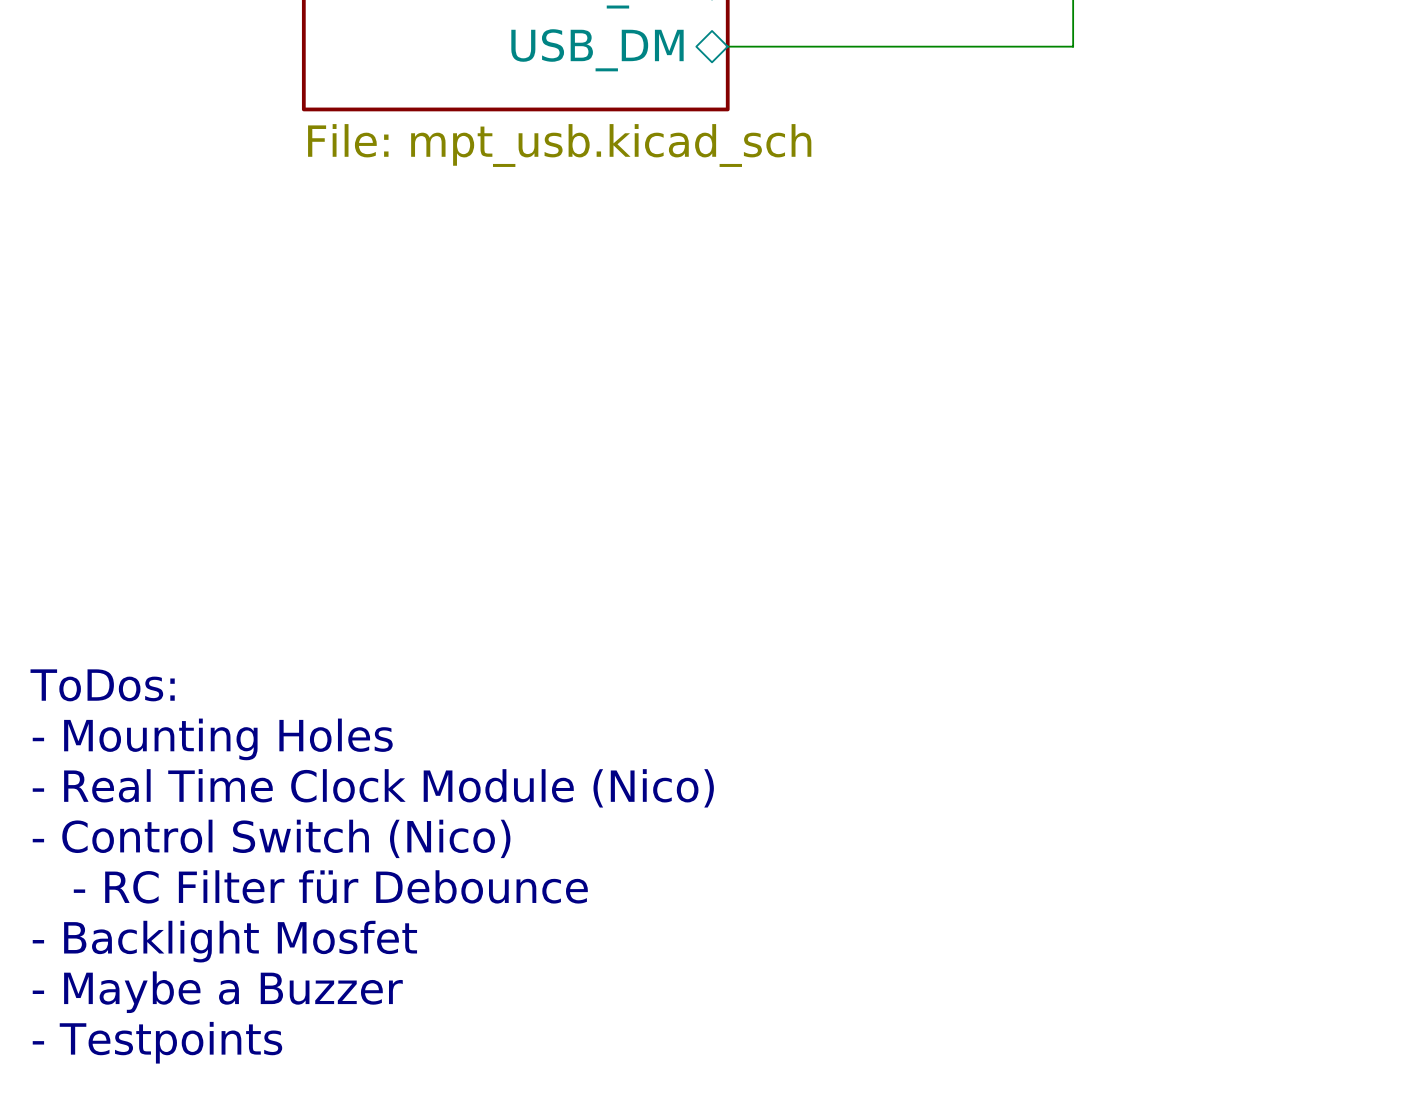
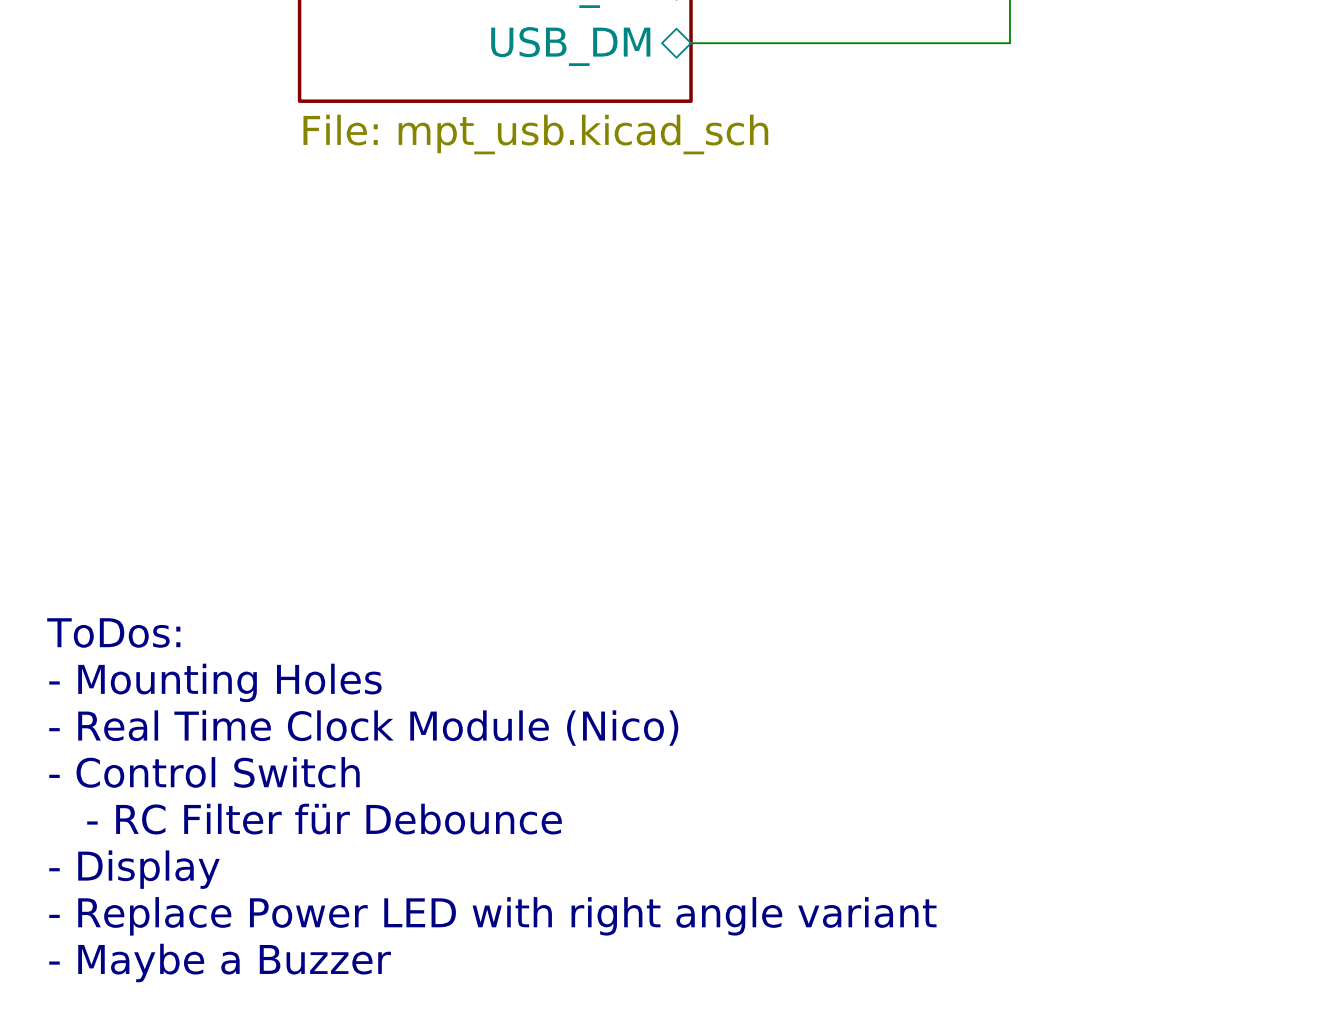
text: - Control Switch (Nico) (271, 838) -> - Control Switch (204, 772)
text: - Backlight Mosfet (224, 941) -> - Display (134, 869)
text: - Maybe a Buzzer (217, 992) -> - Replace Power LED with right angle variant (492, 916)
text: - Testpoints (157, 1042) -> - Maybe a Buzzer (220, 963)

